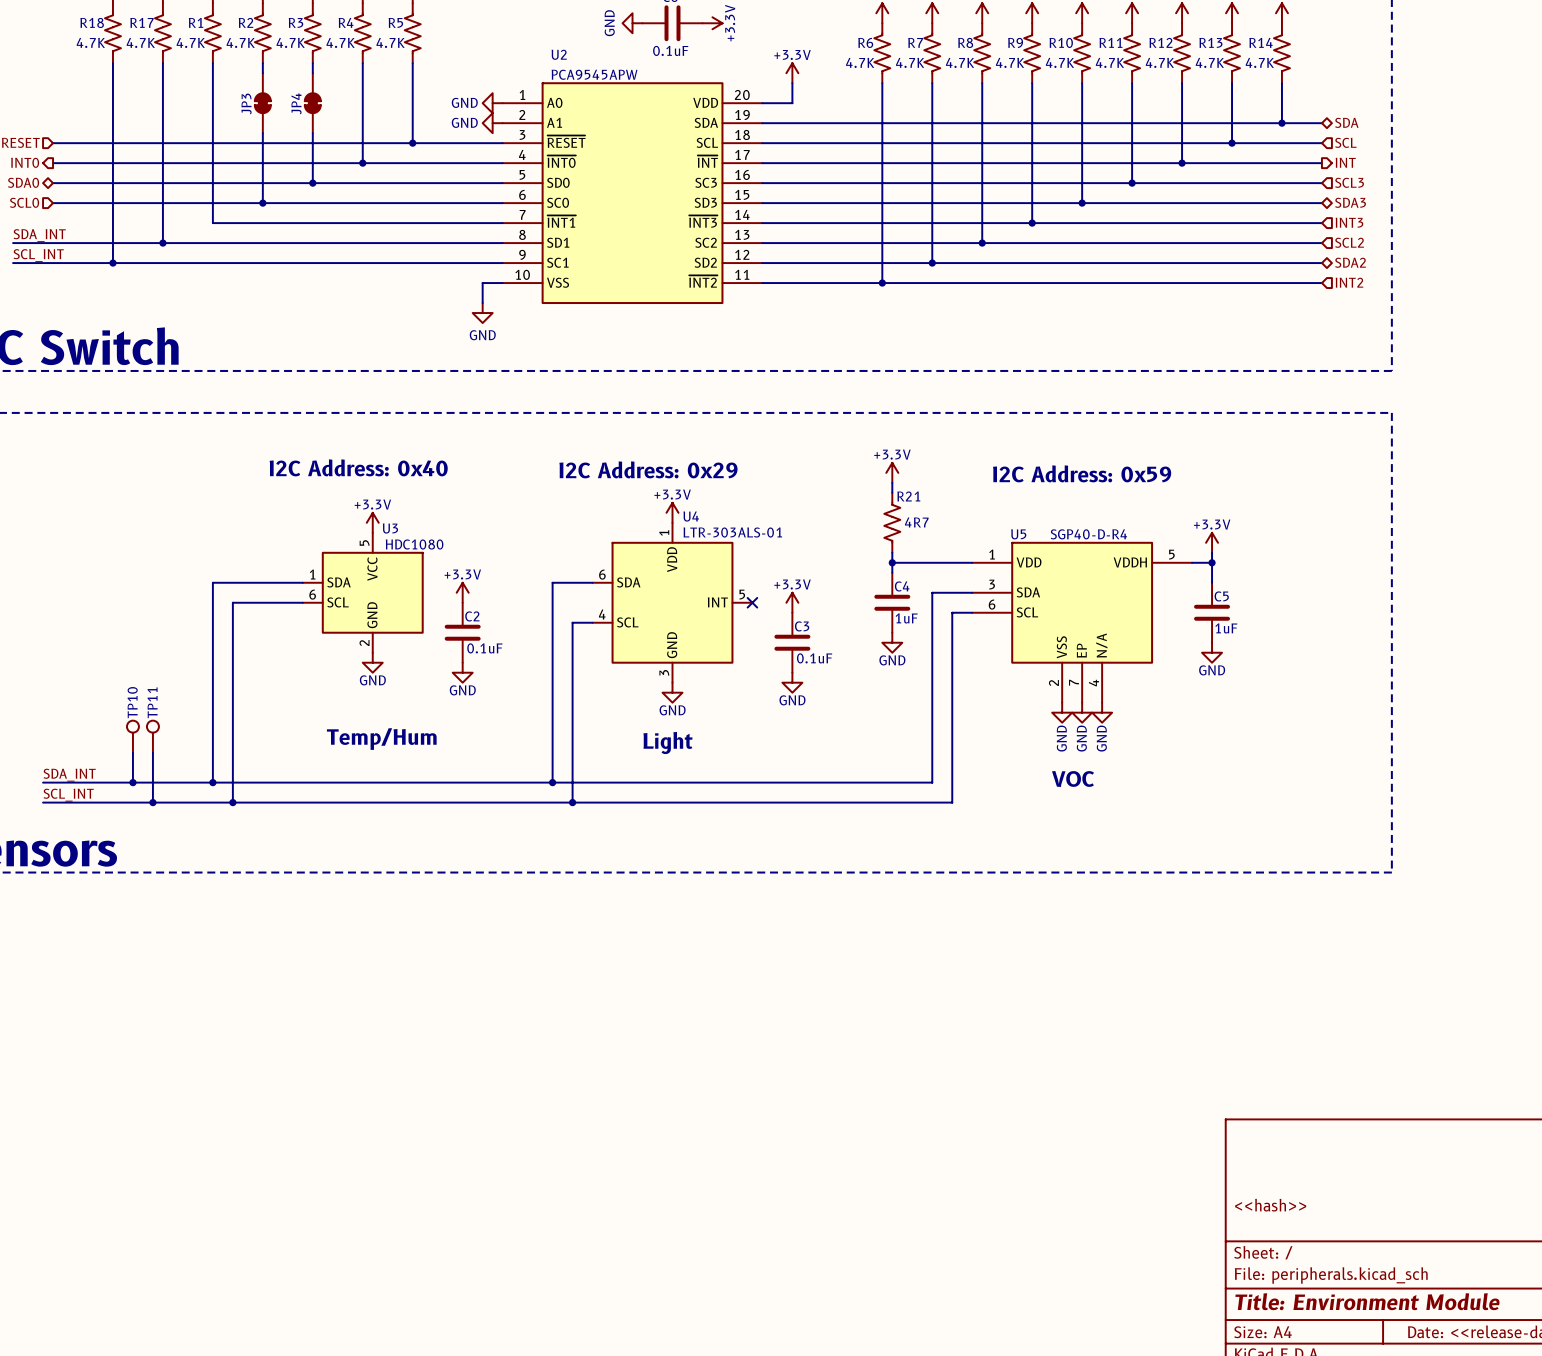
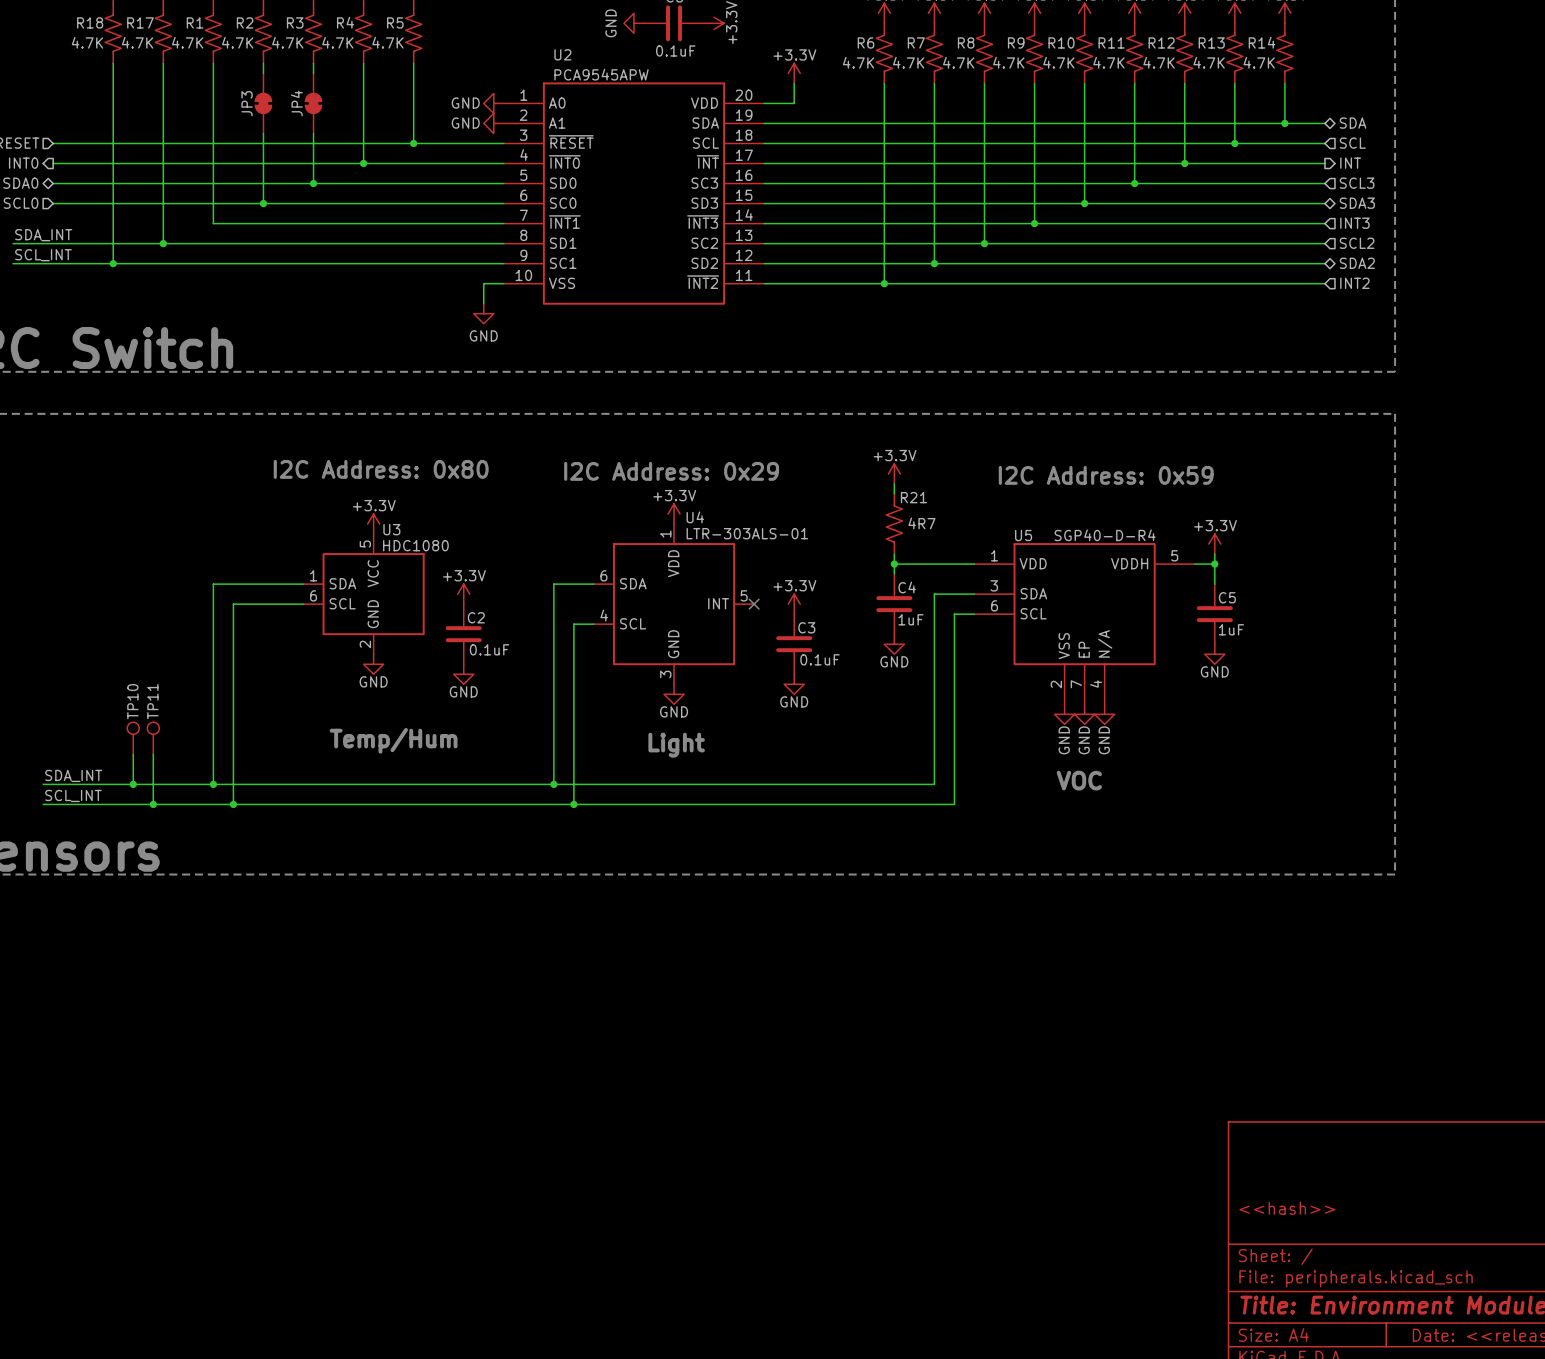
text: I2C Address: 0x40 (358, 467) -> I2C Address: 0x80 (381, 469)

